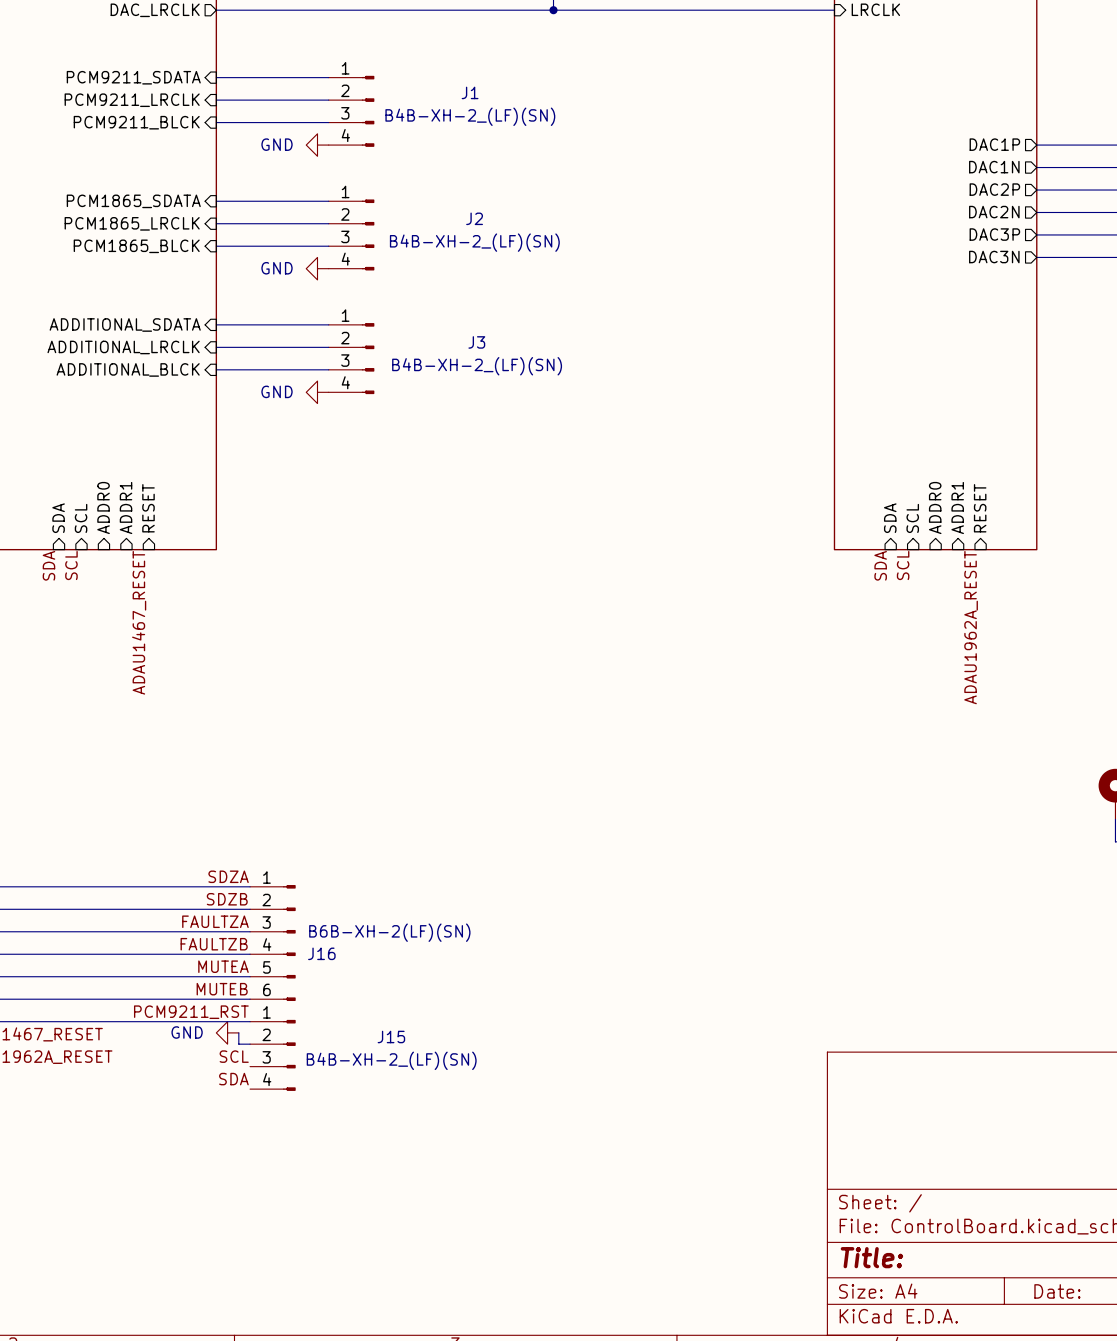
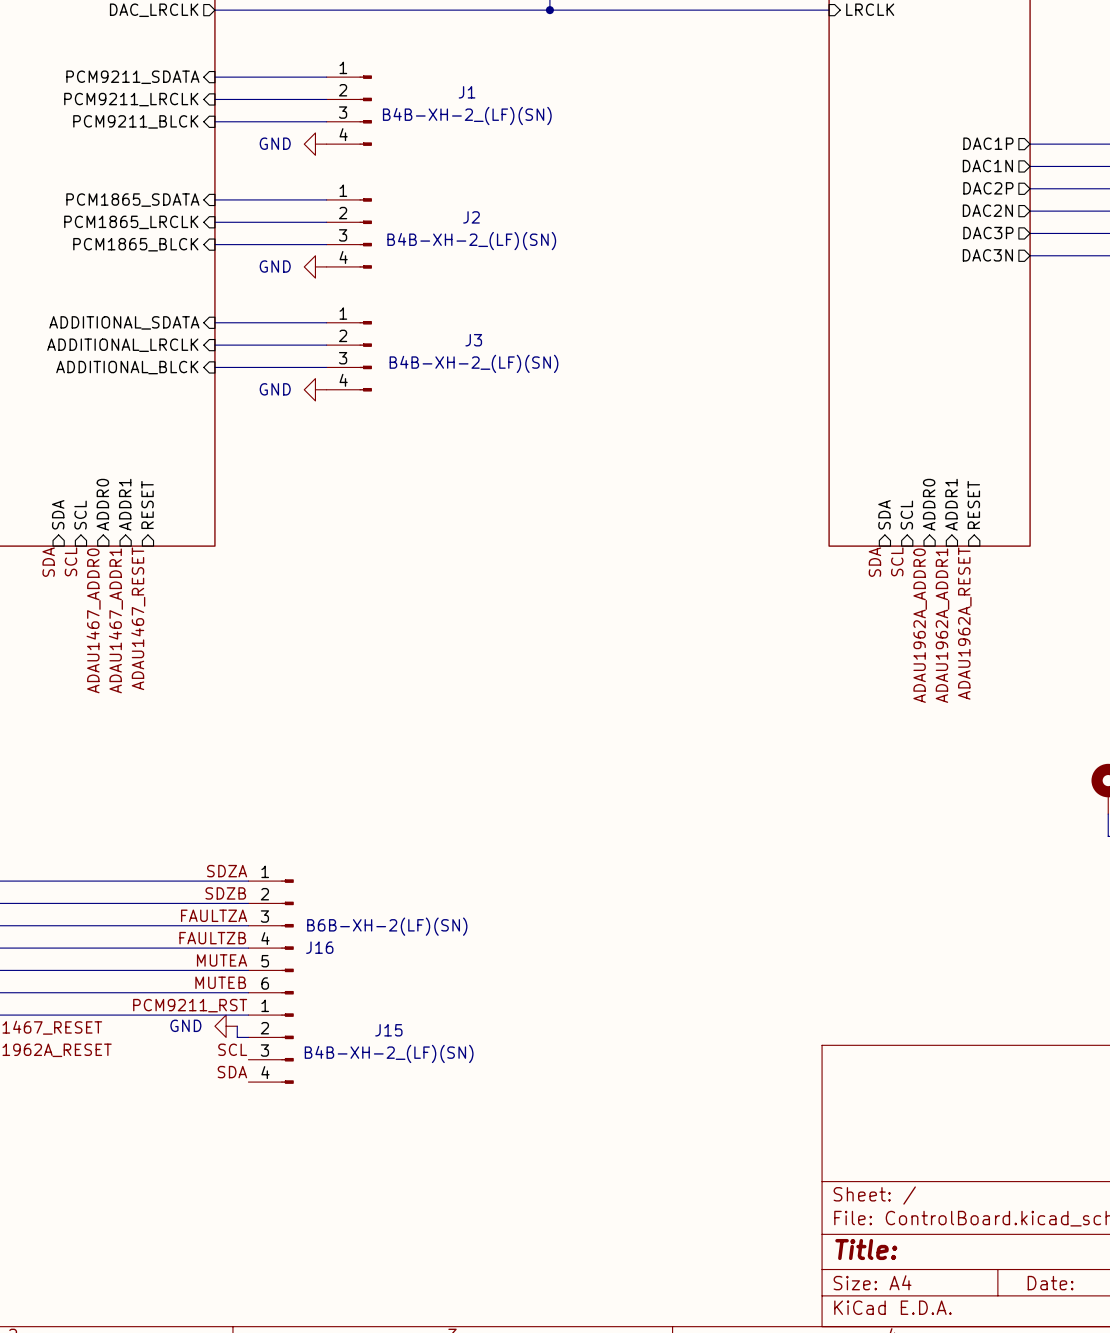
label: none -> ADAU1467_ADDR0 (93, 620)
label: none -> ADAU1467_ADDR1 (115, 620)
label: none -> ADAU1962A_ADDR0 (920, 625)
label: none -> ADAU1962A_ADDR1 (942, 625)

